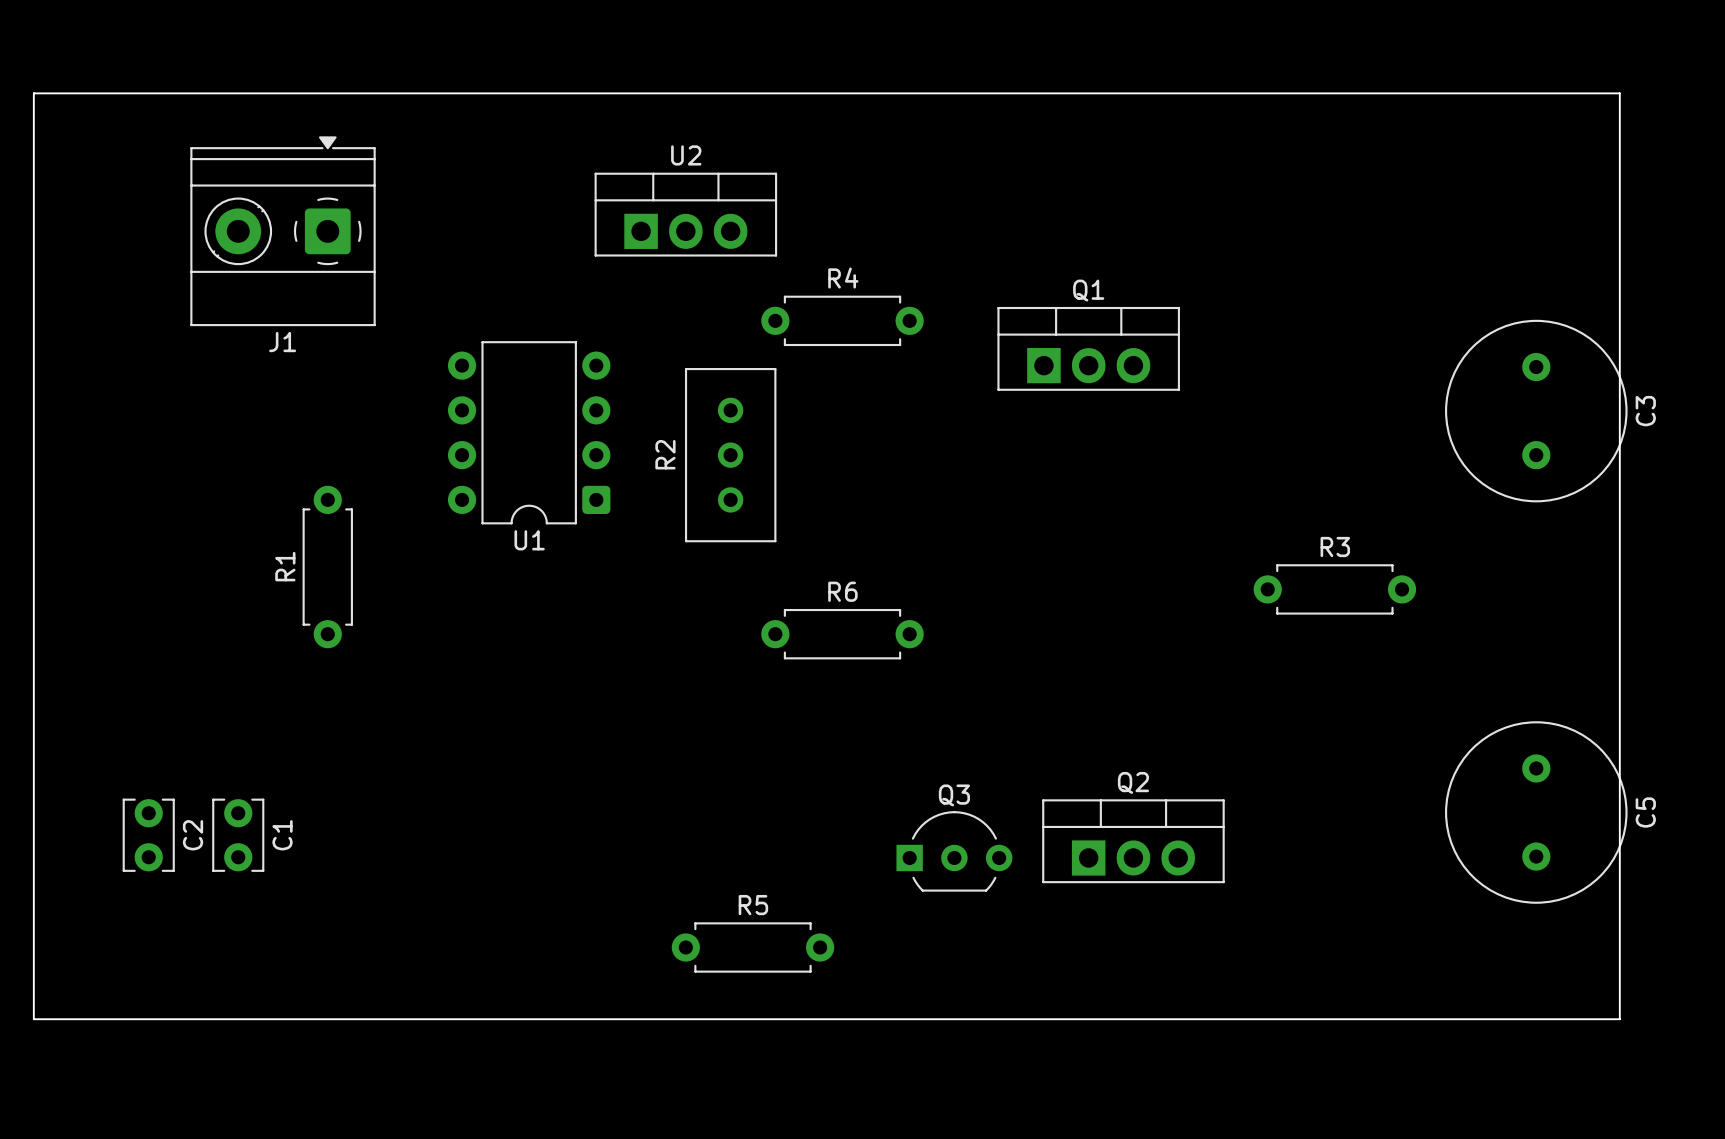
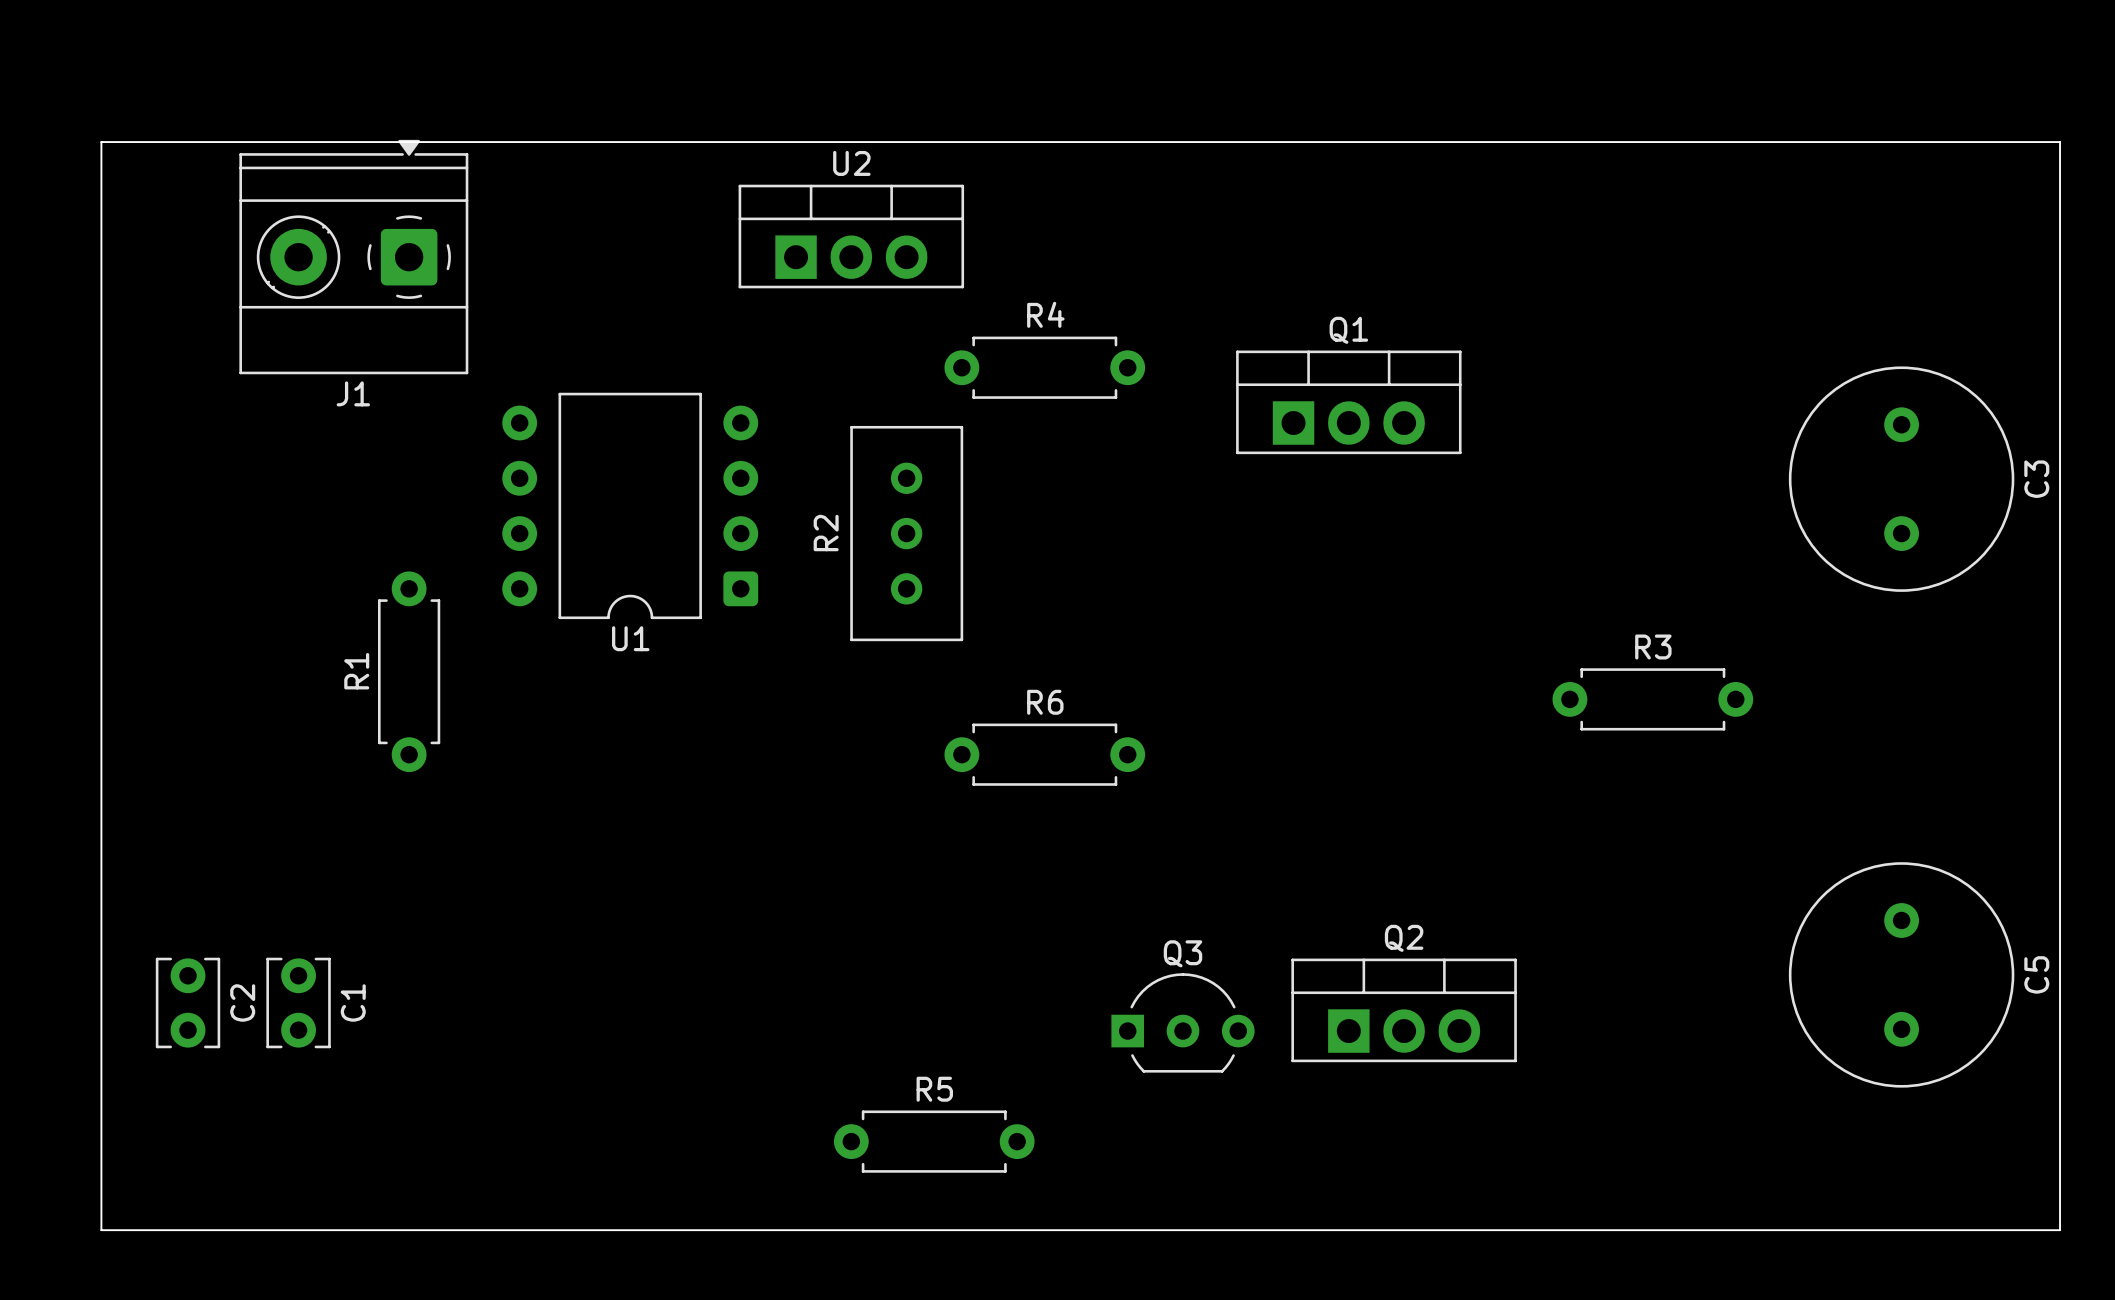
U1 footprint: [447, 341, 611, 525] -> [502, 392, 759, 620]
board edge: (78, 1019) (33, 1019) (33, 93) (1619, 93) (1619, 1019) -> (101, 1230) (101, 142) (2060, 142) (2060, 1230) (2004, 1230)

